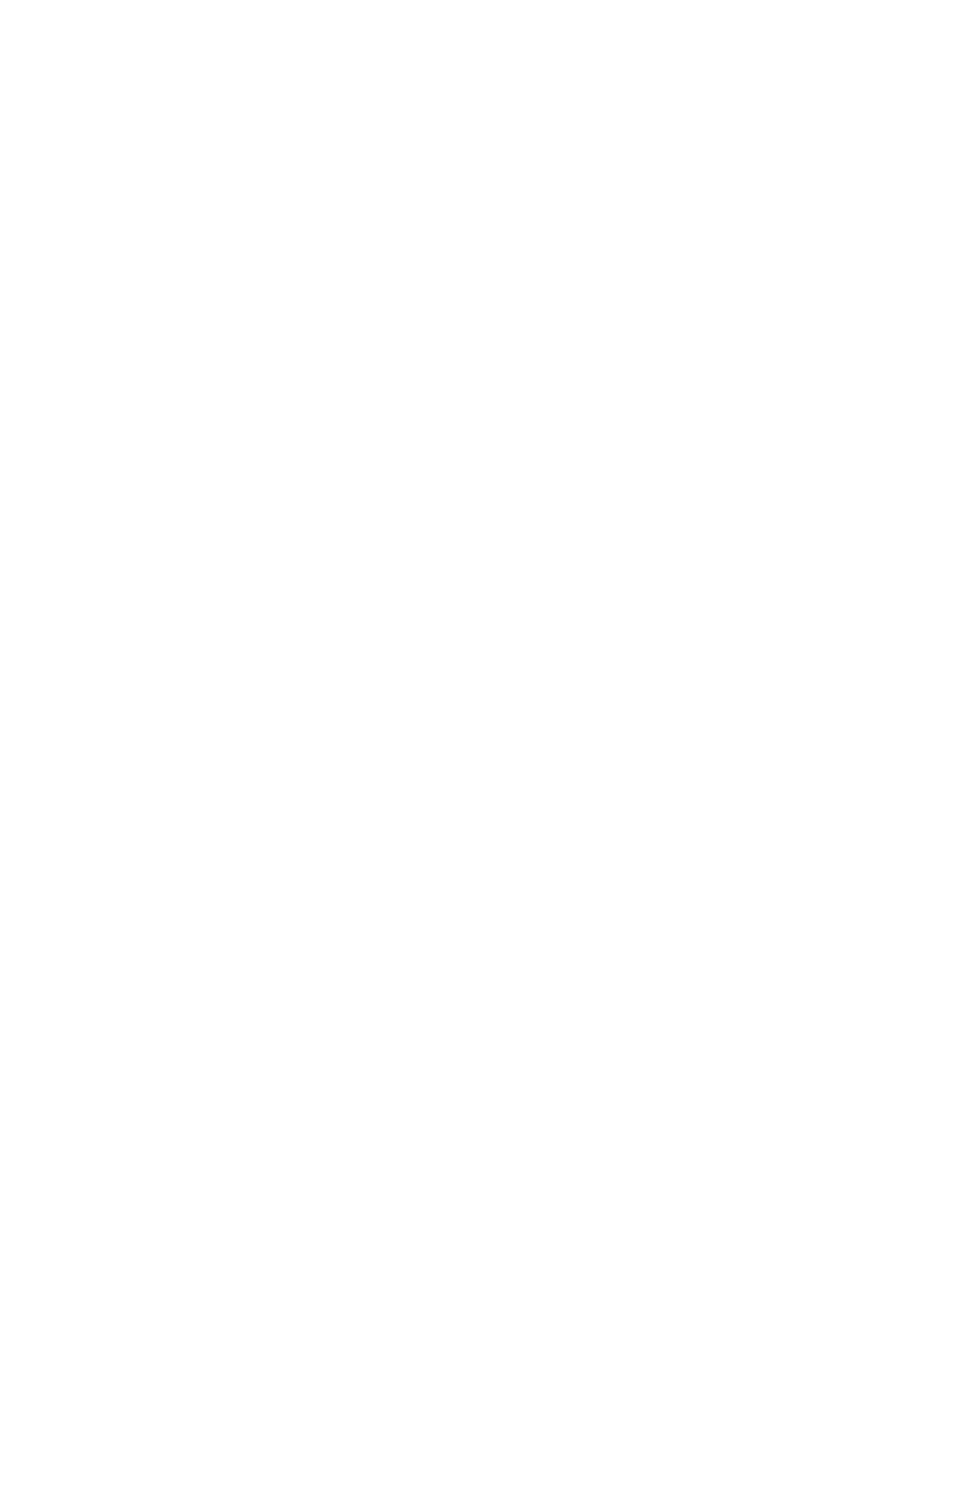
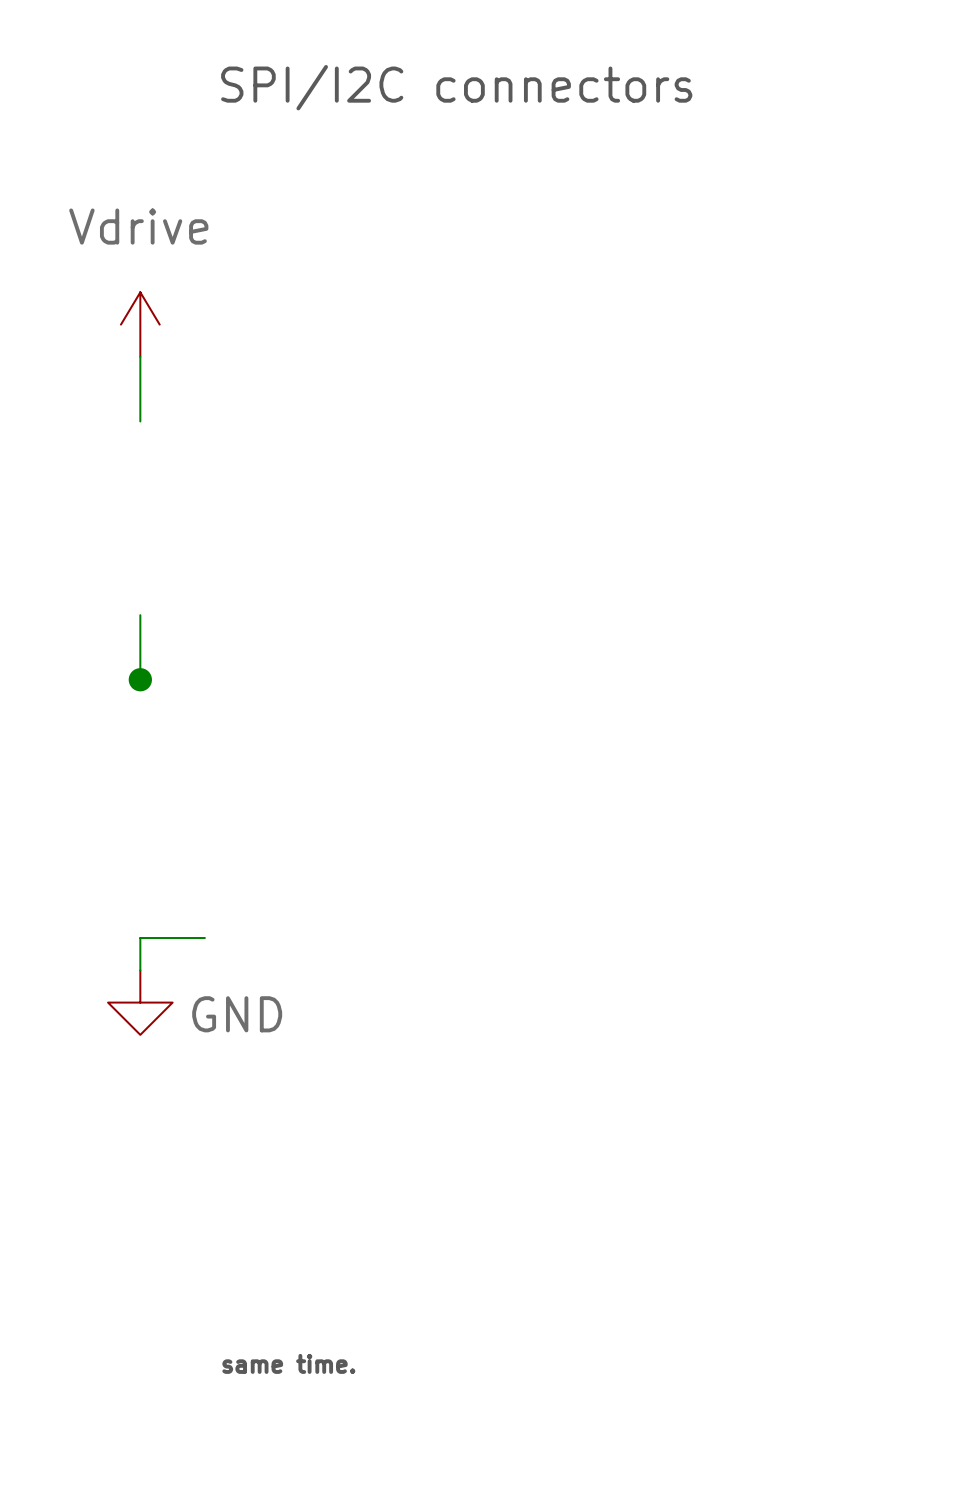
text: none -> SPI/I2C connectors (456, 87)
power symbol: none -> Vdrive (140, 324)
wire: none -> (140, 356) (140, 421)
wire: none -> (140, 615) (140, 679)
junction: none -> (140, 679)
wire: none -> (204, 938) (140, 938) (140, 970)
power symbol: none -> GND (140, 1002)
text: none -> same time. (288, 1363)

